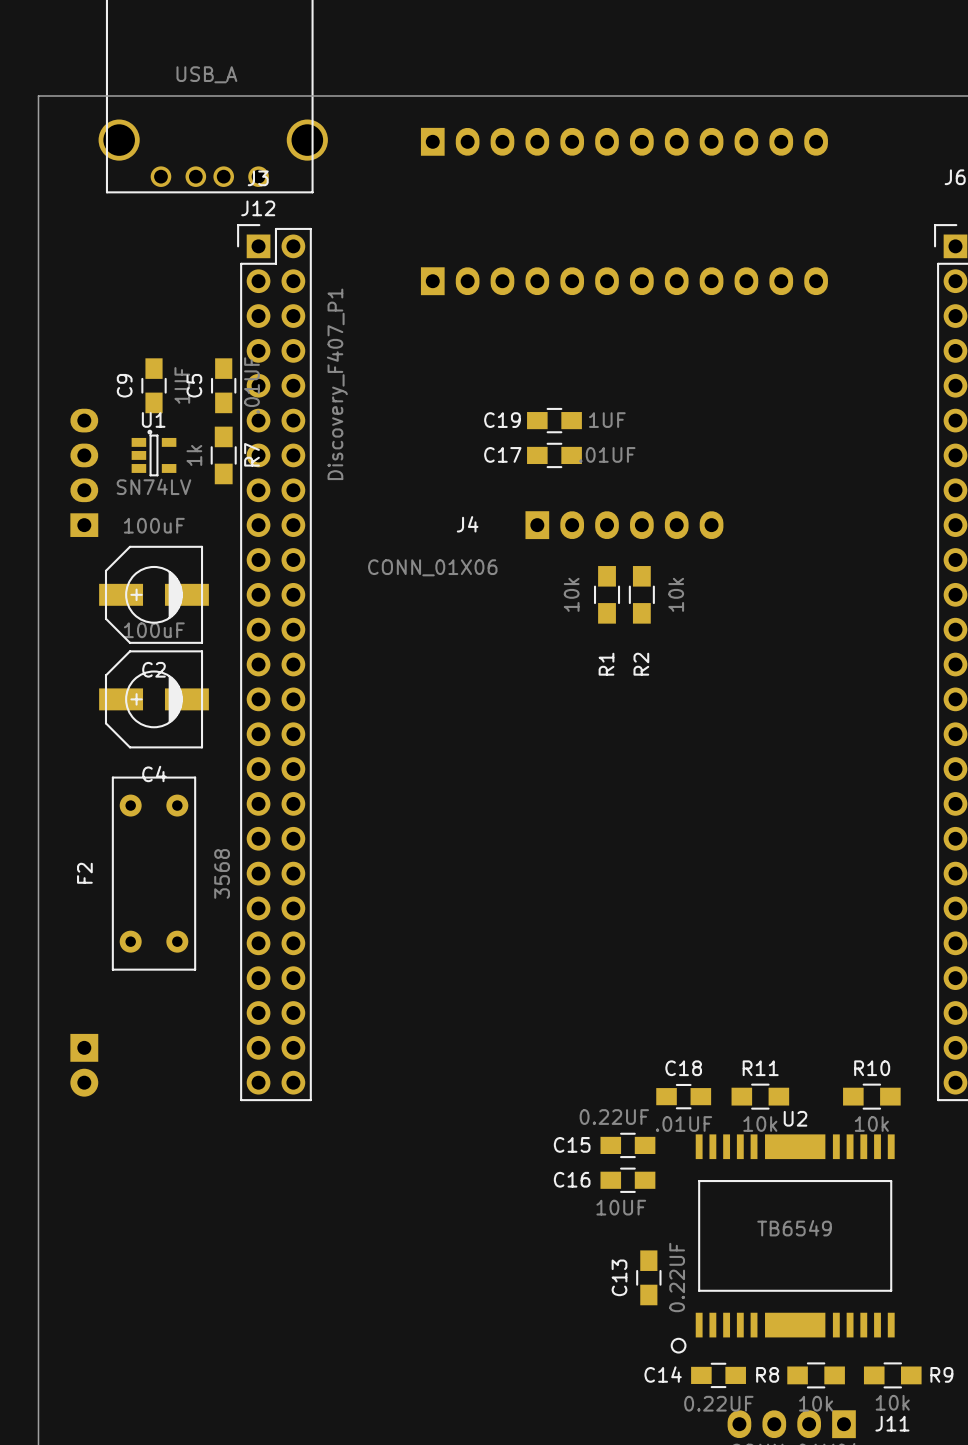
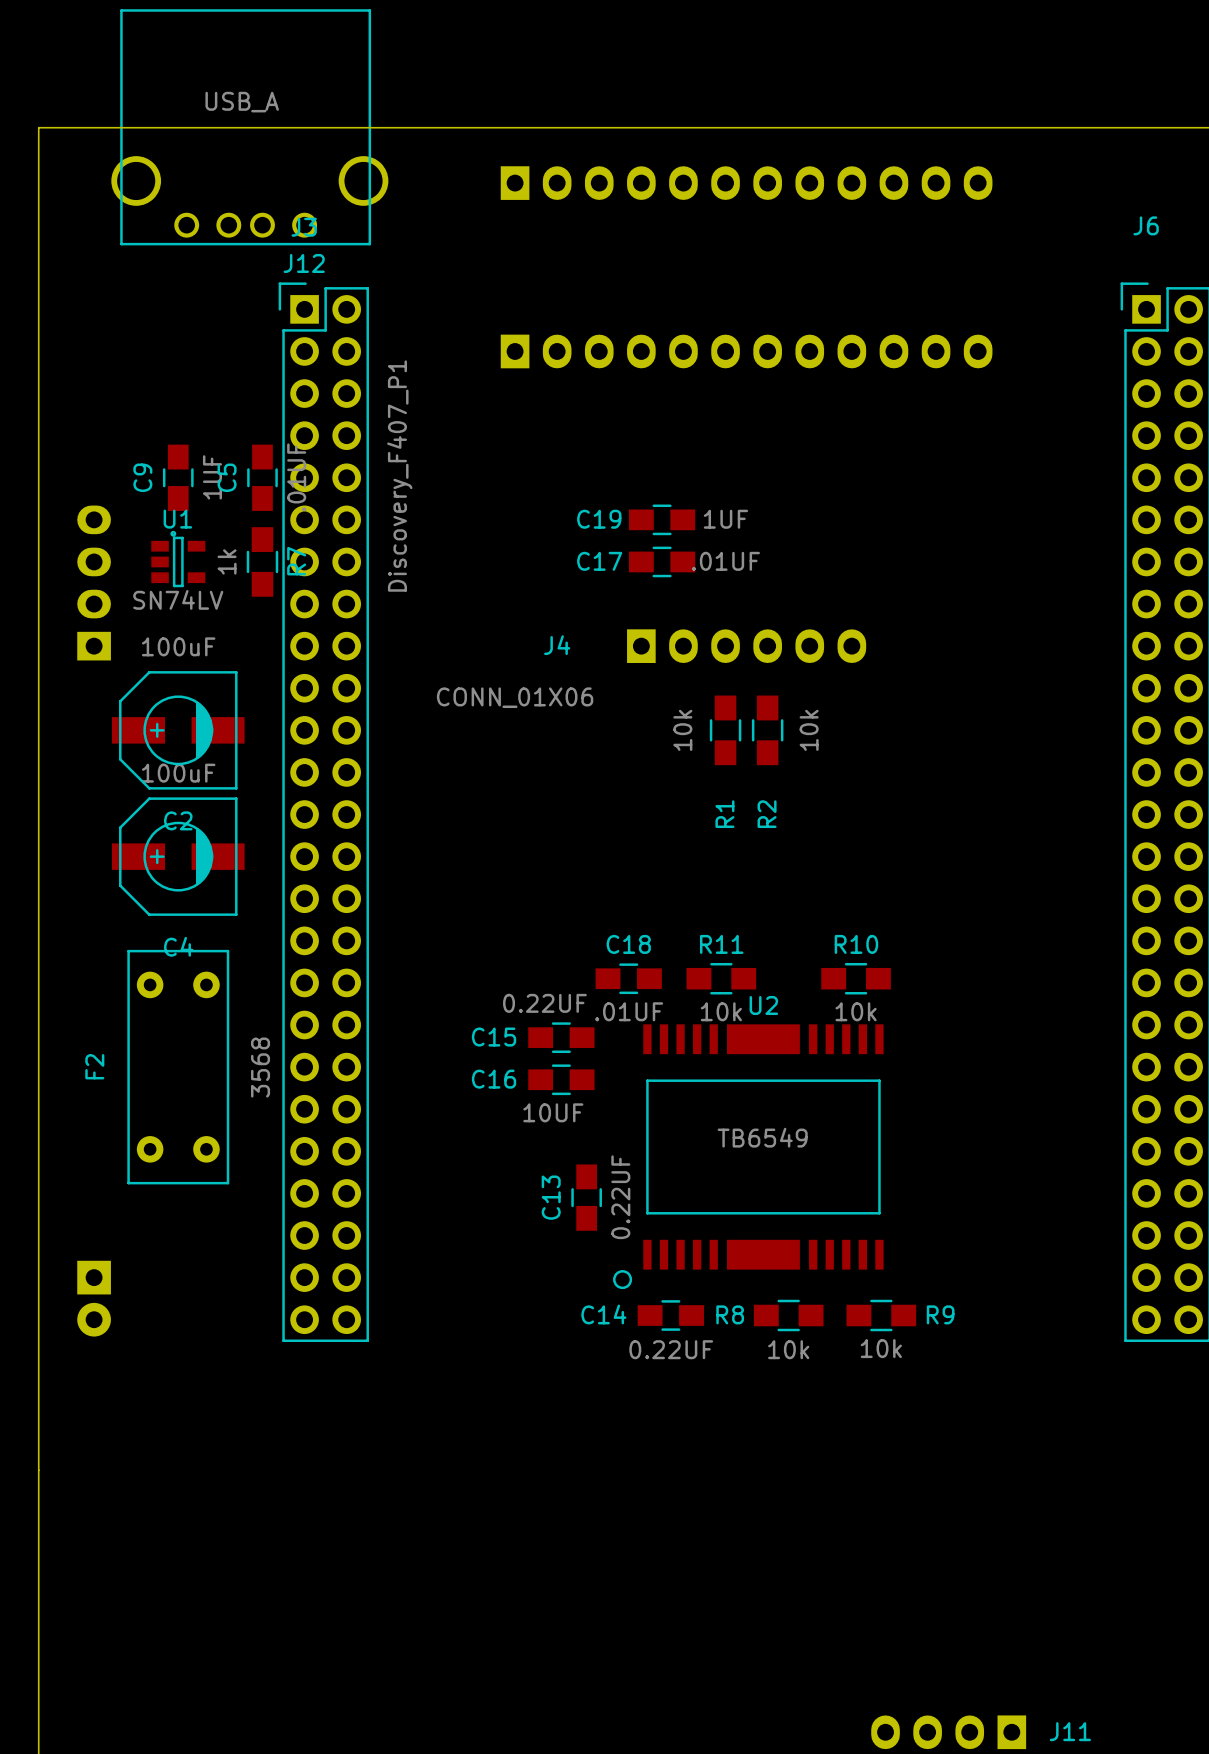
C18 position: (683, 1096) -> (628, 978)
R11 position: (760, 1096) -> (721, 978)
R10 position: (871, 1096) -> (856, 978)
C15 position: (627, 1145) -> (561, 1037)
C16 position: (627, 1180) -> (561, 1079)
U2 position: (782, 1243) -> (748, 1156)
C13 position: (648, 1277) -> (586, 1197)
C14 position: (718, 1375) -> (670, 1315)
R8 position: (816, 1375) -> (788, 1315)
R9 position: (892, 1375) -> (881, 1315)

